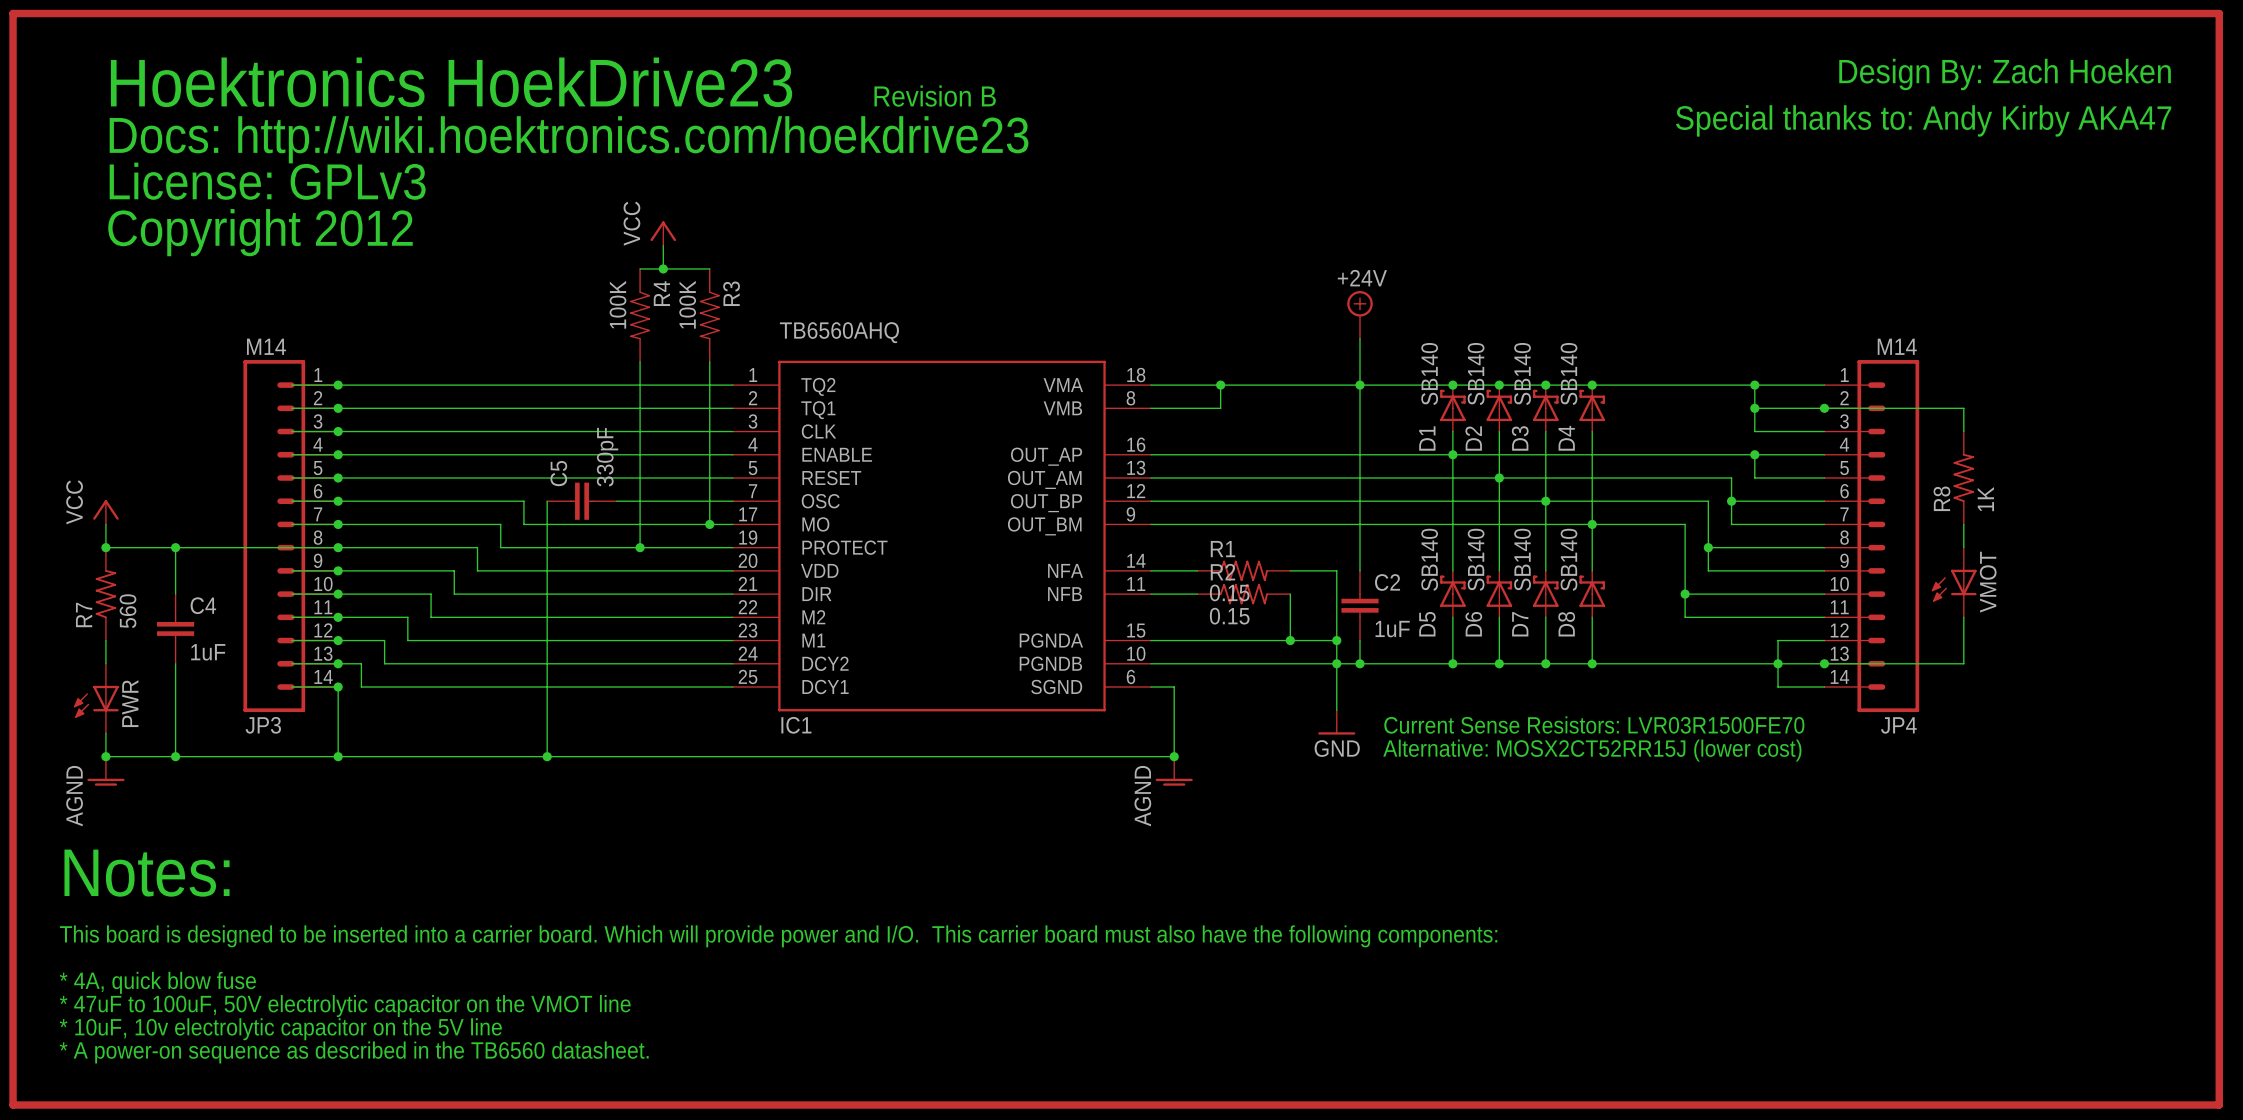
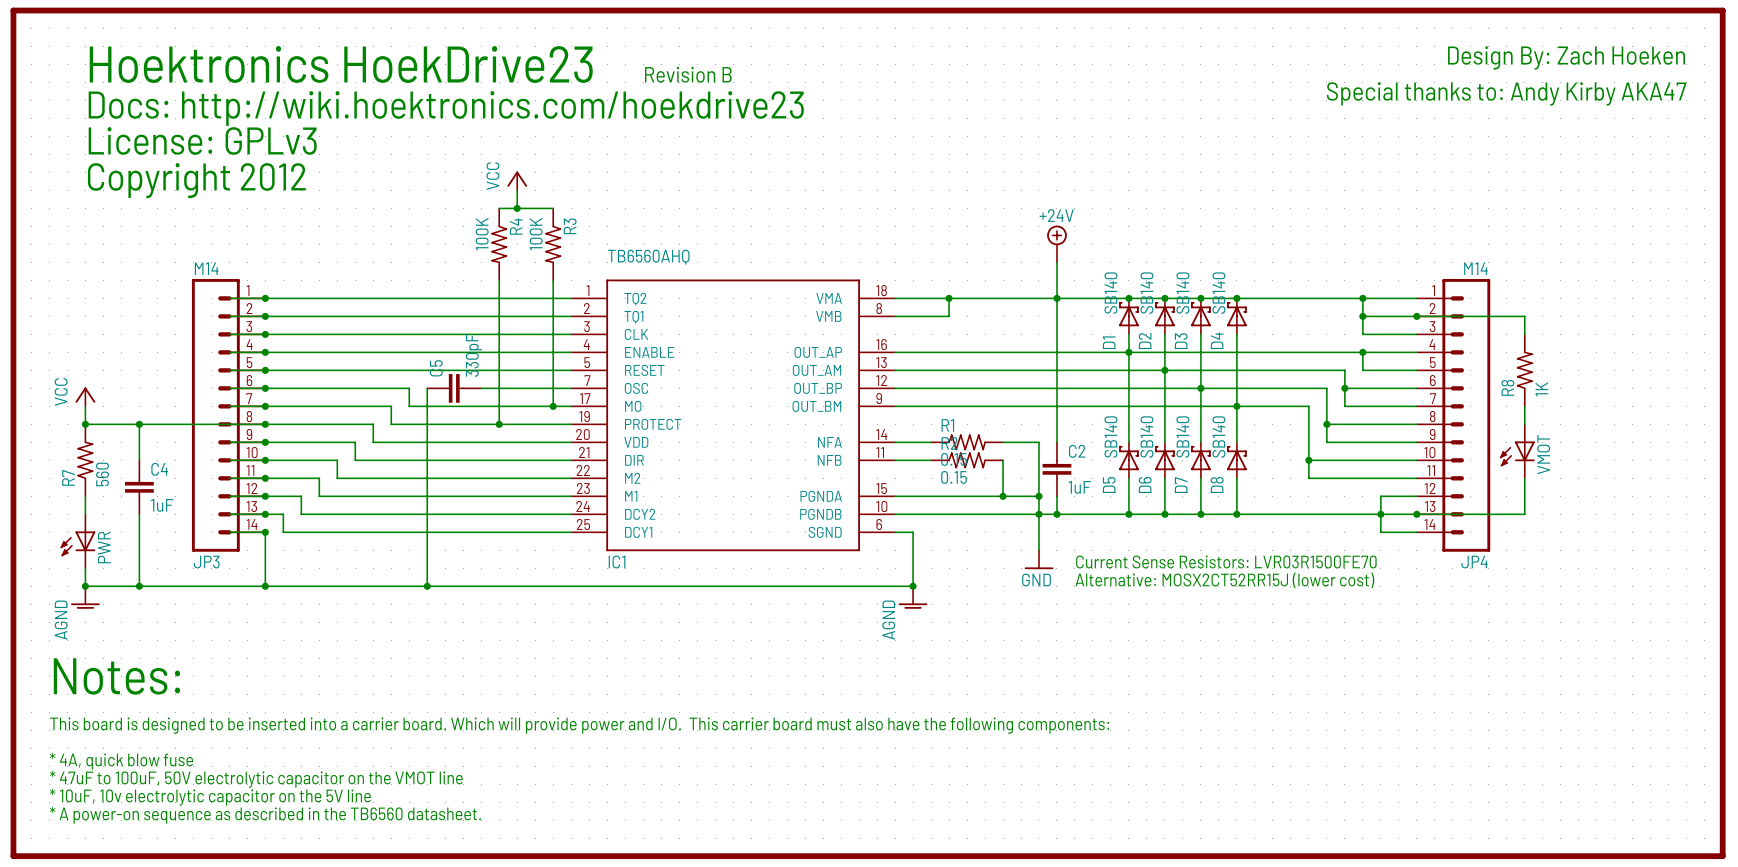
text position: Revision B (935, 96) -> Revision B (688, 74)

